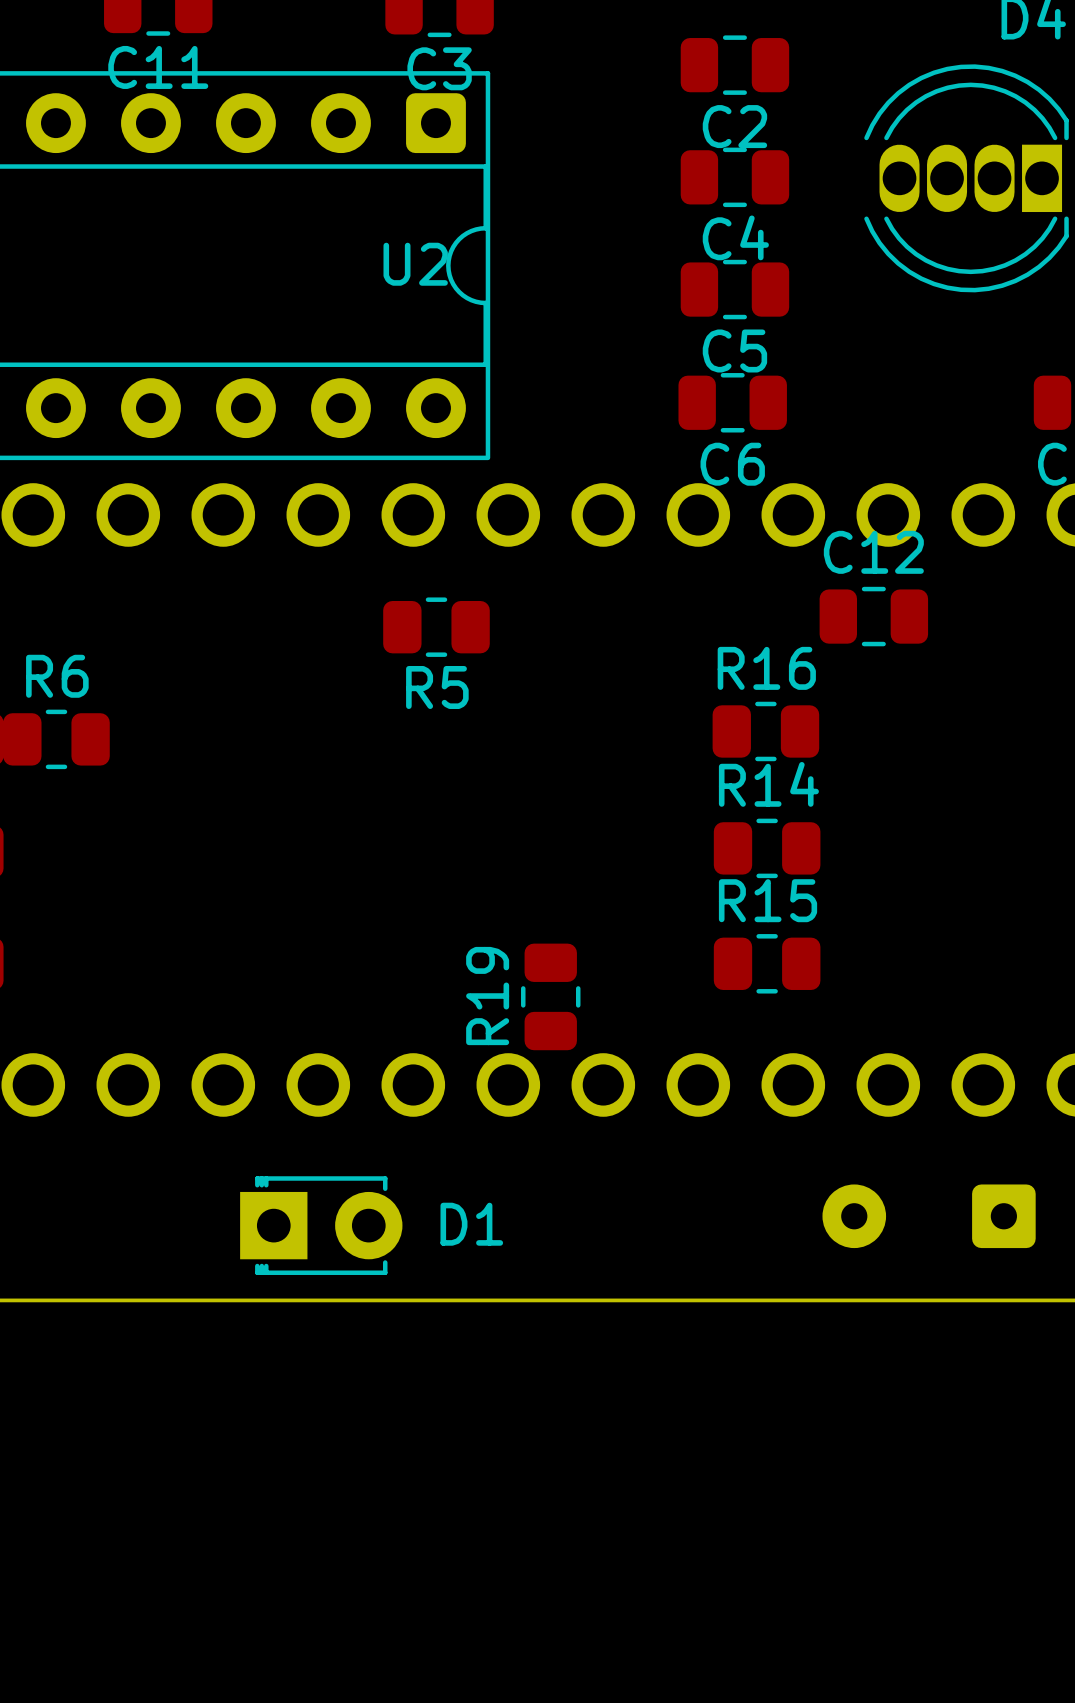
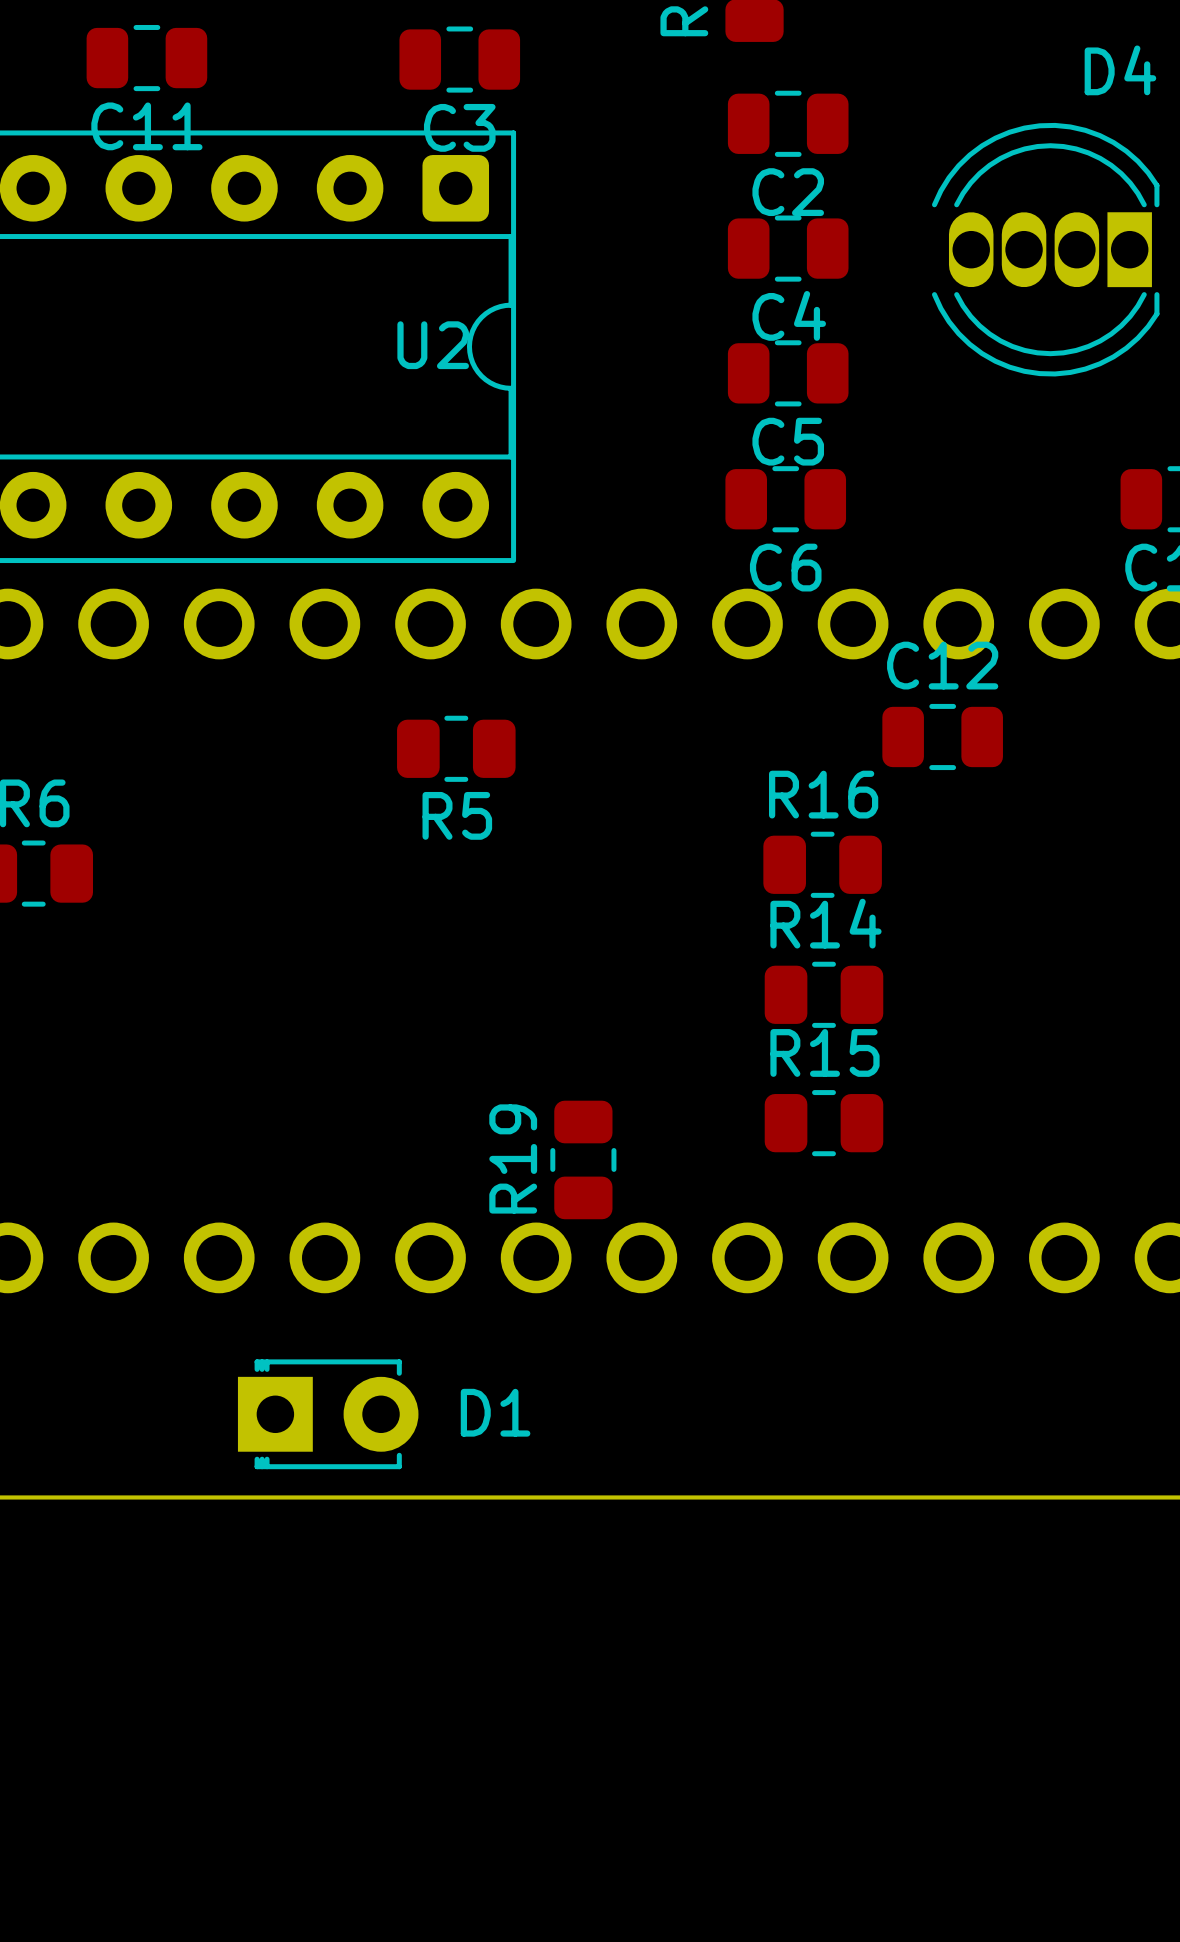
part: (929, 1216) -> none

